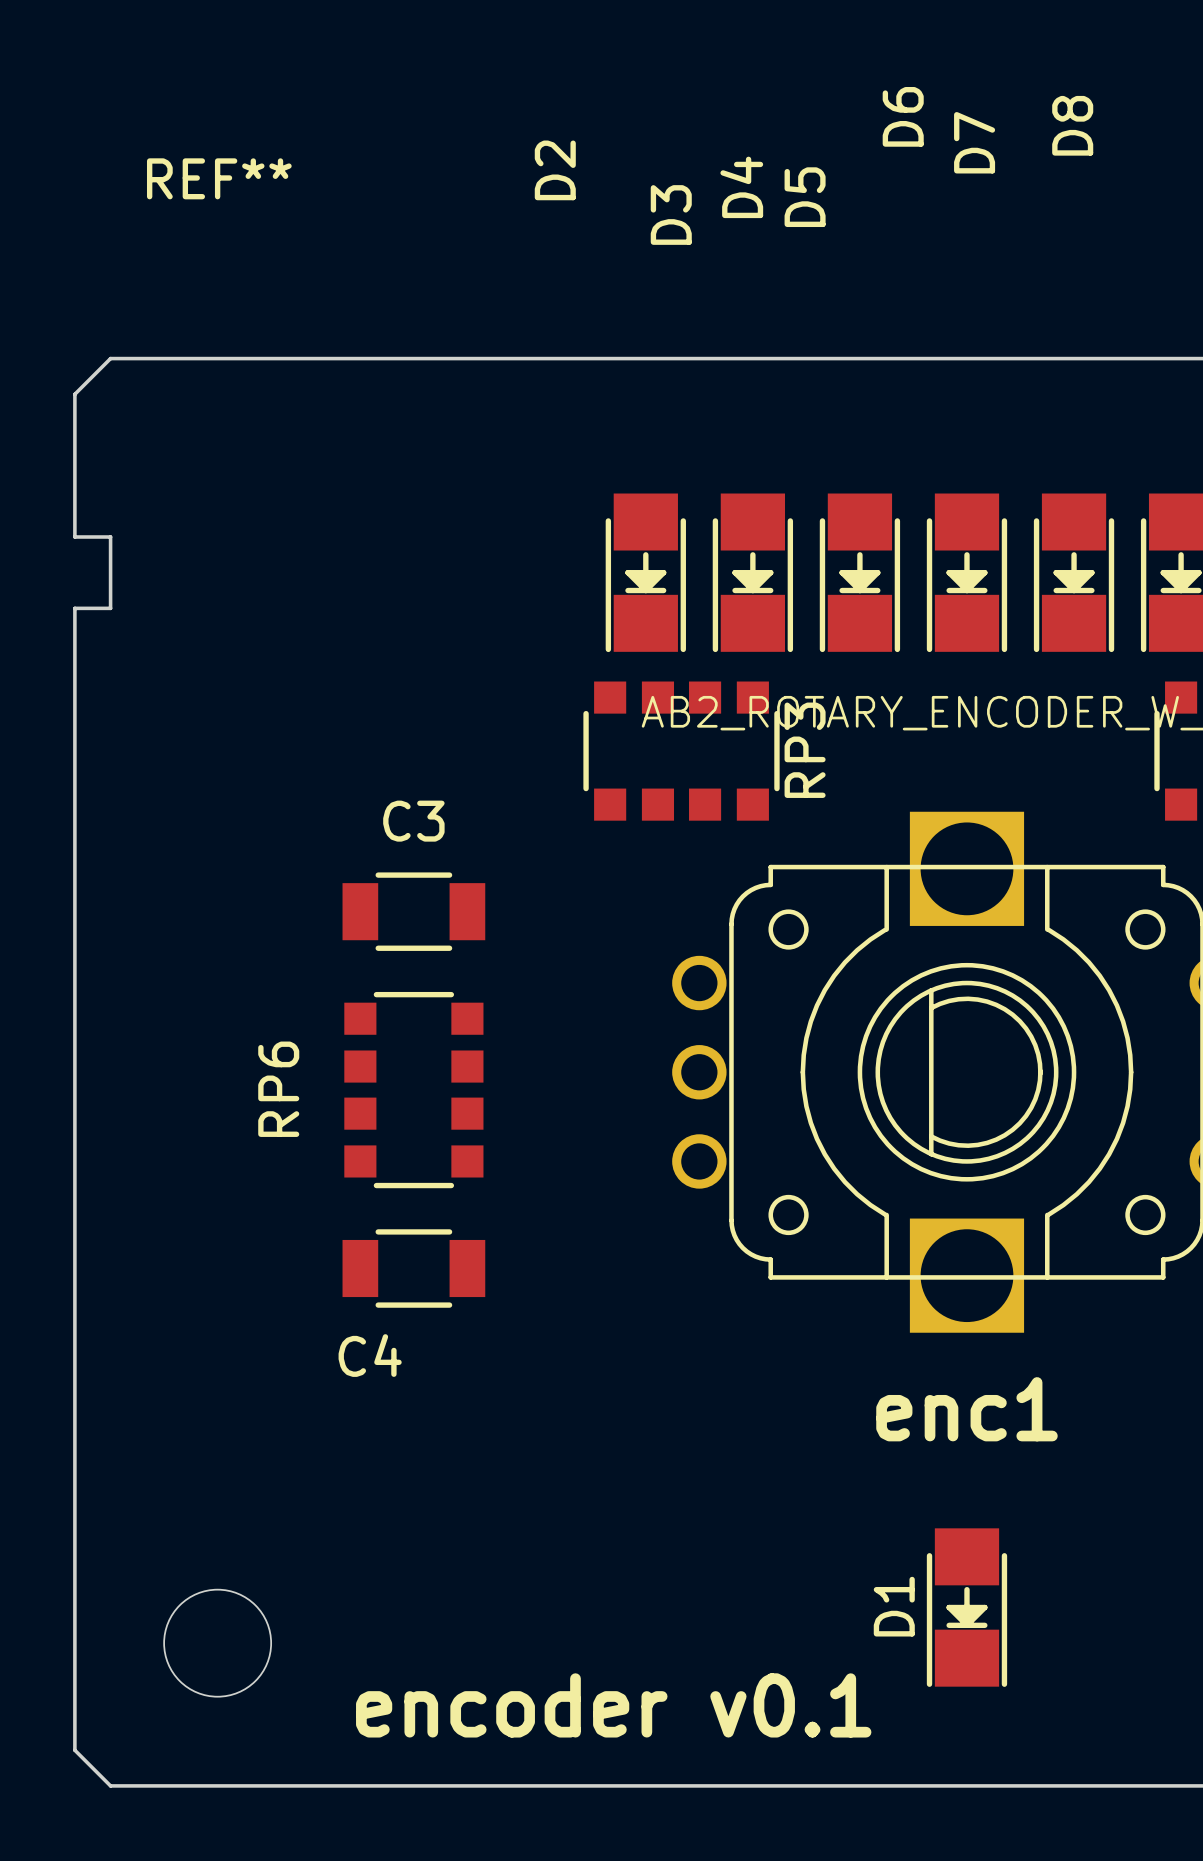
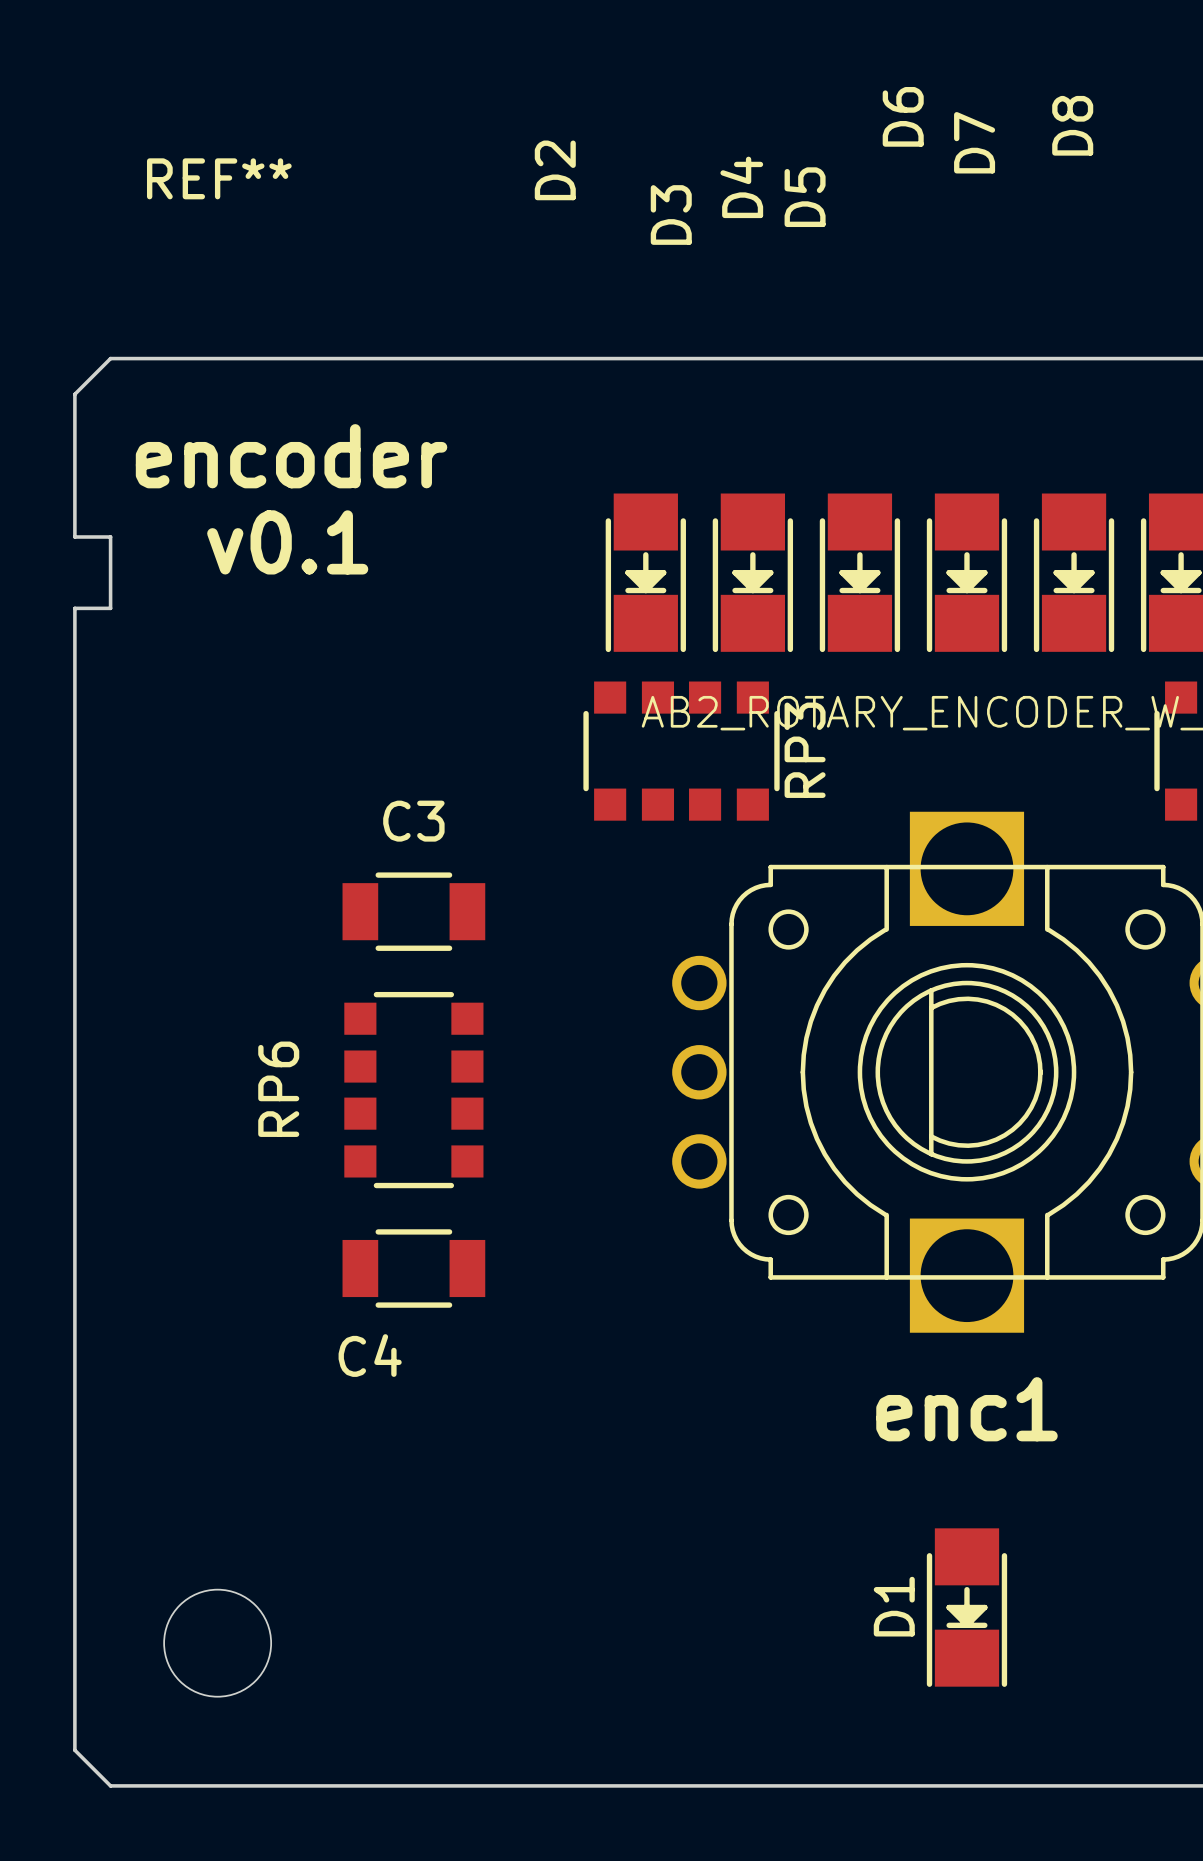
text: none -> encoder (291, 456)
text: none -> v0.1 (287, 542)
text: encoder v0.1 (613, 1705) -> none

